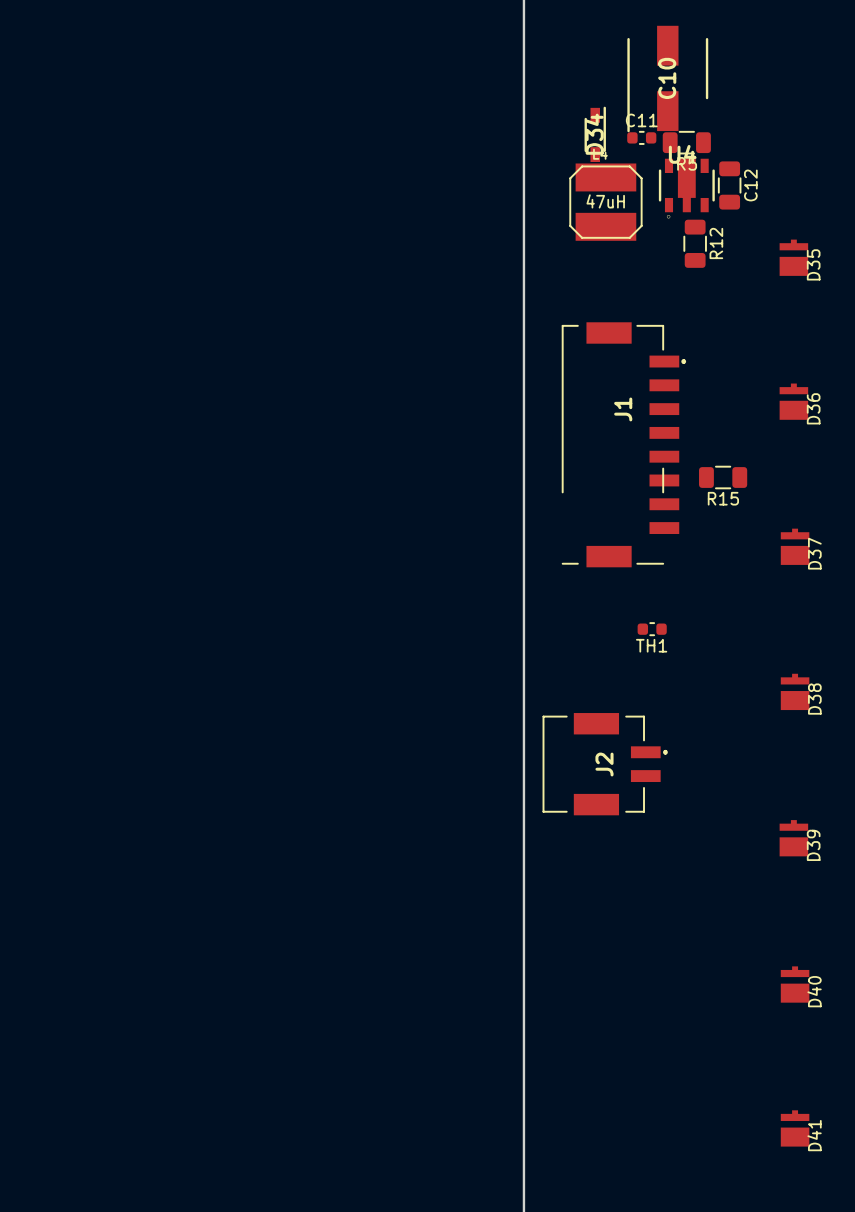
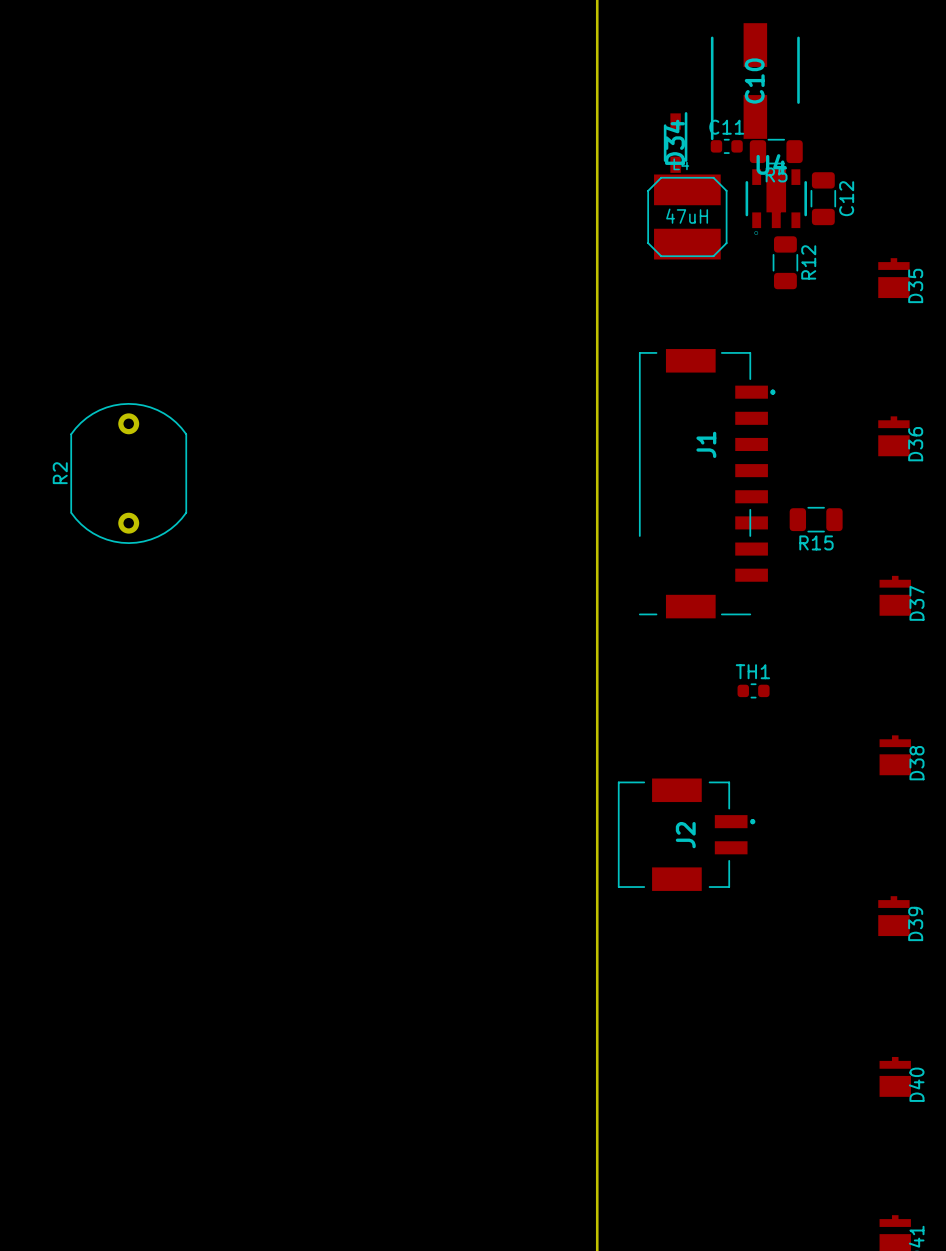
R2: none -> (128, 473)
TH1 position: (652, 629) -> (753, 690)
TH1 name position: TH1 (651, 645) -> TH1 (752, 671)

